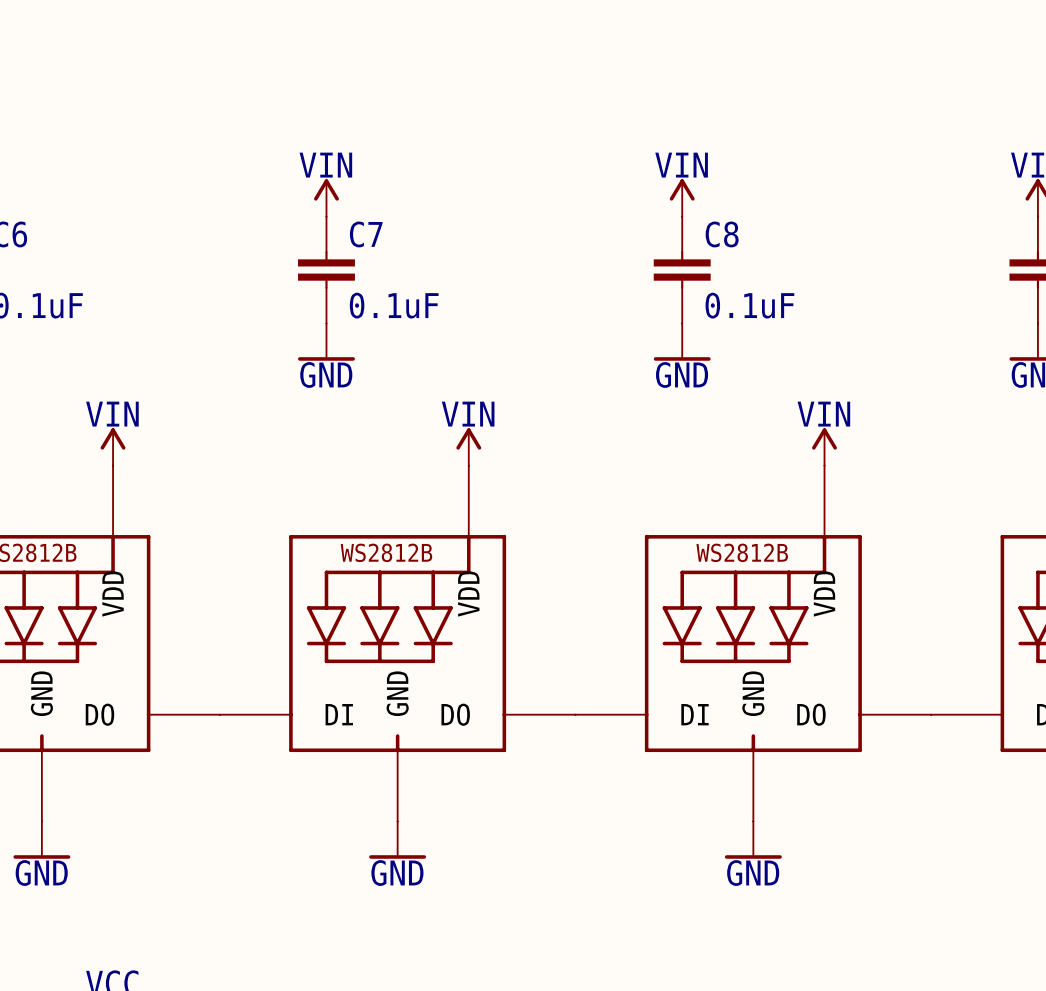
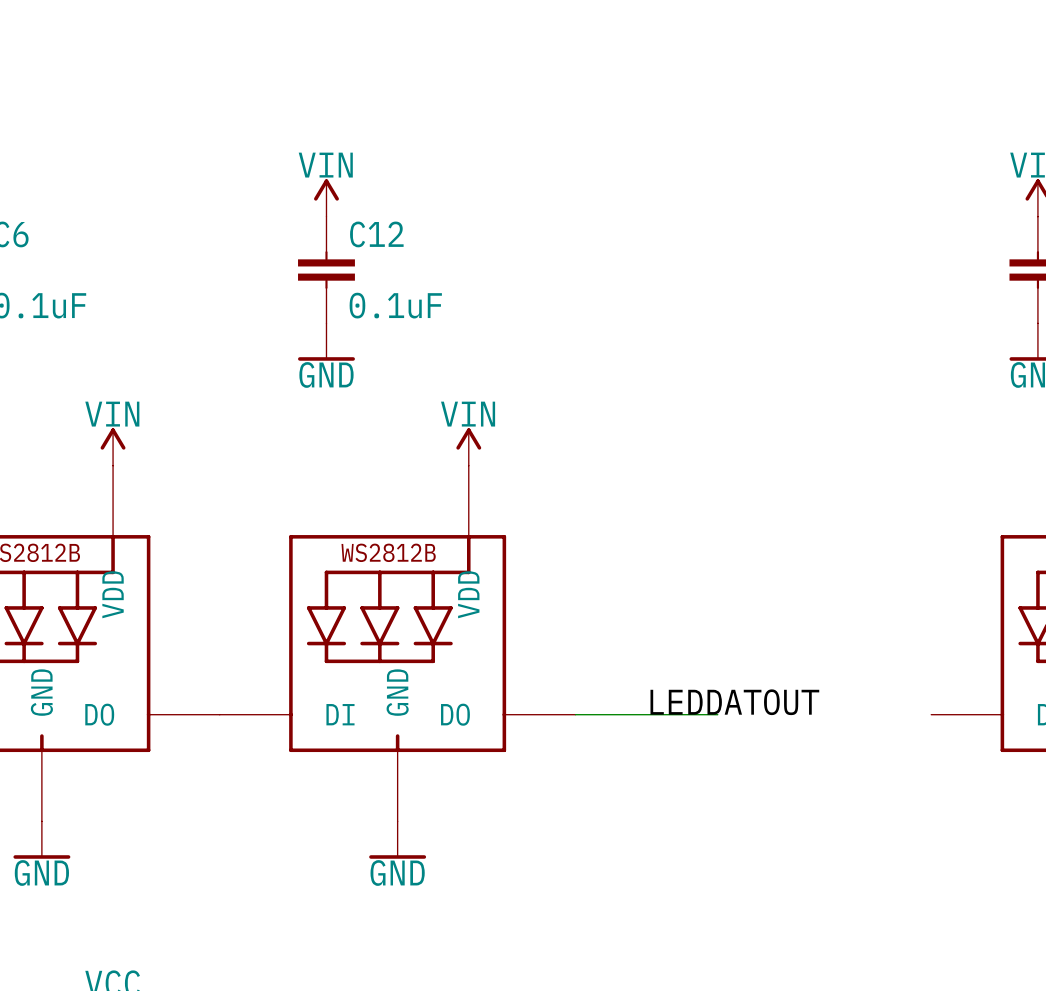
power symbol: VIN (682, 197) -> none
C7 name: C7 (366, 234) -> C12 (376, 234)
C8: 0.1uF (682, 270) -> none
power symbol: GND (682, 342) -> none
power symbol: VIN (824, 447) -> none
part: (753, 643) -> none
label: none -> LEDDATOUT (734, 702)
power symbol: GND (753, 840) -> none

